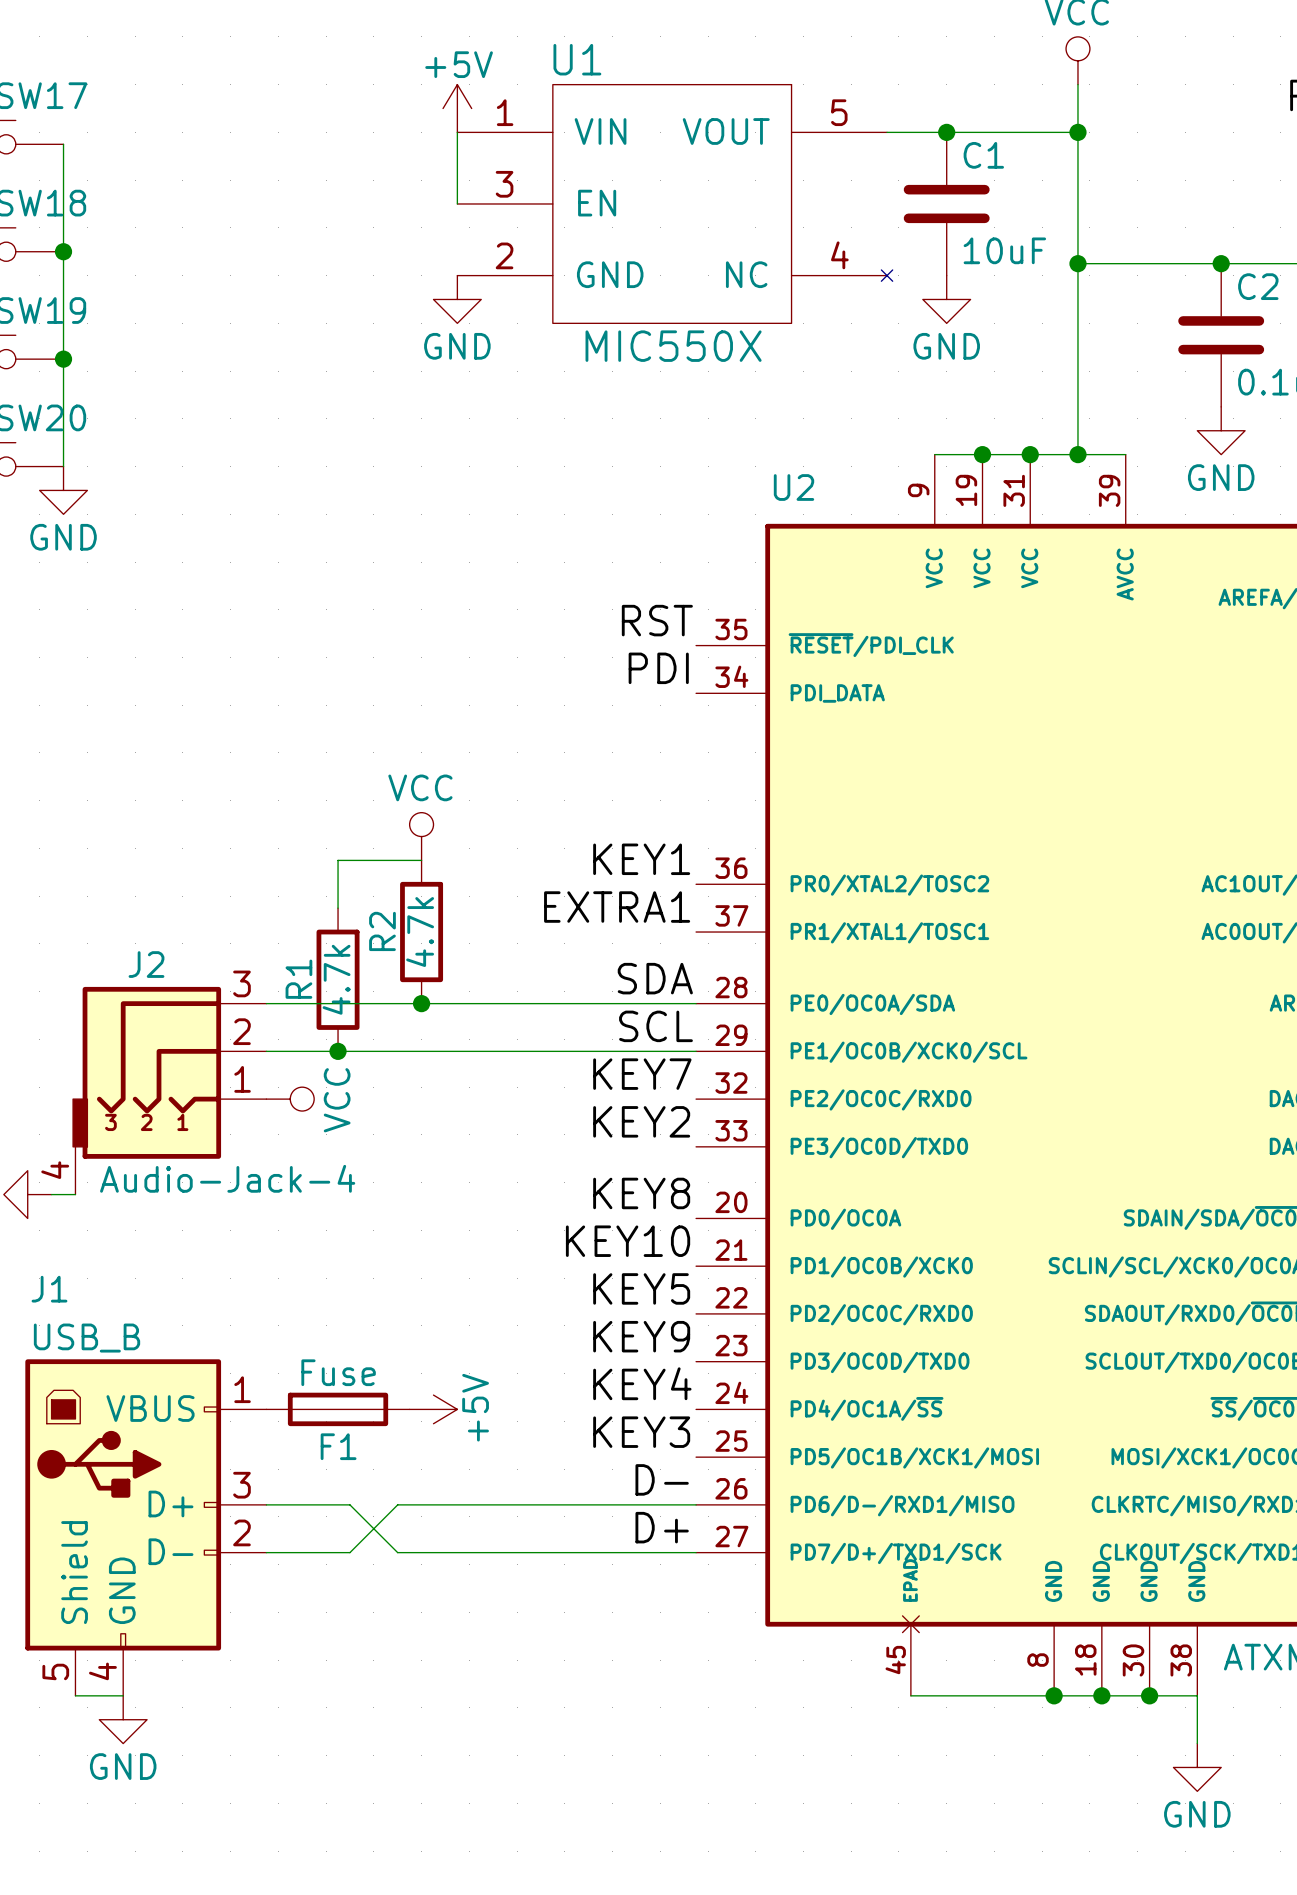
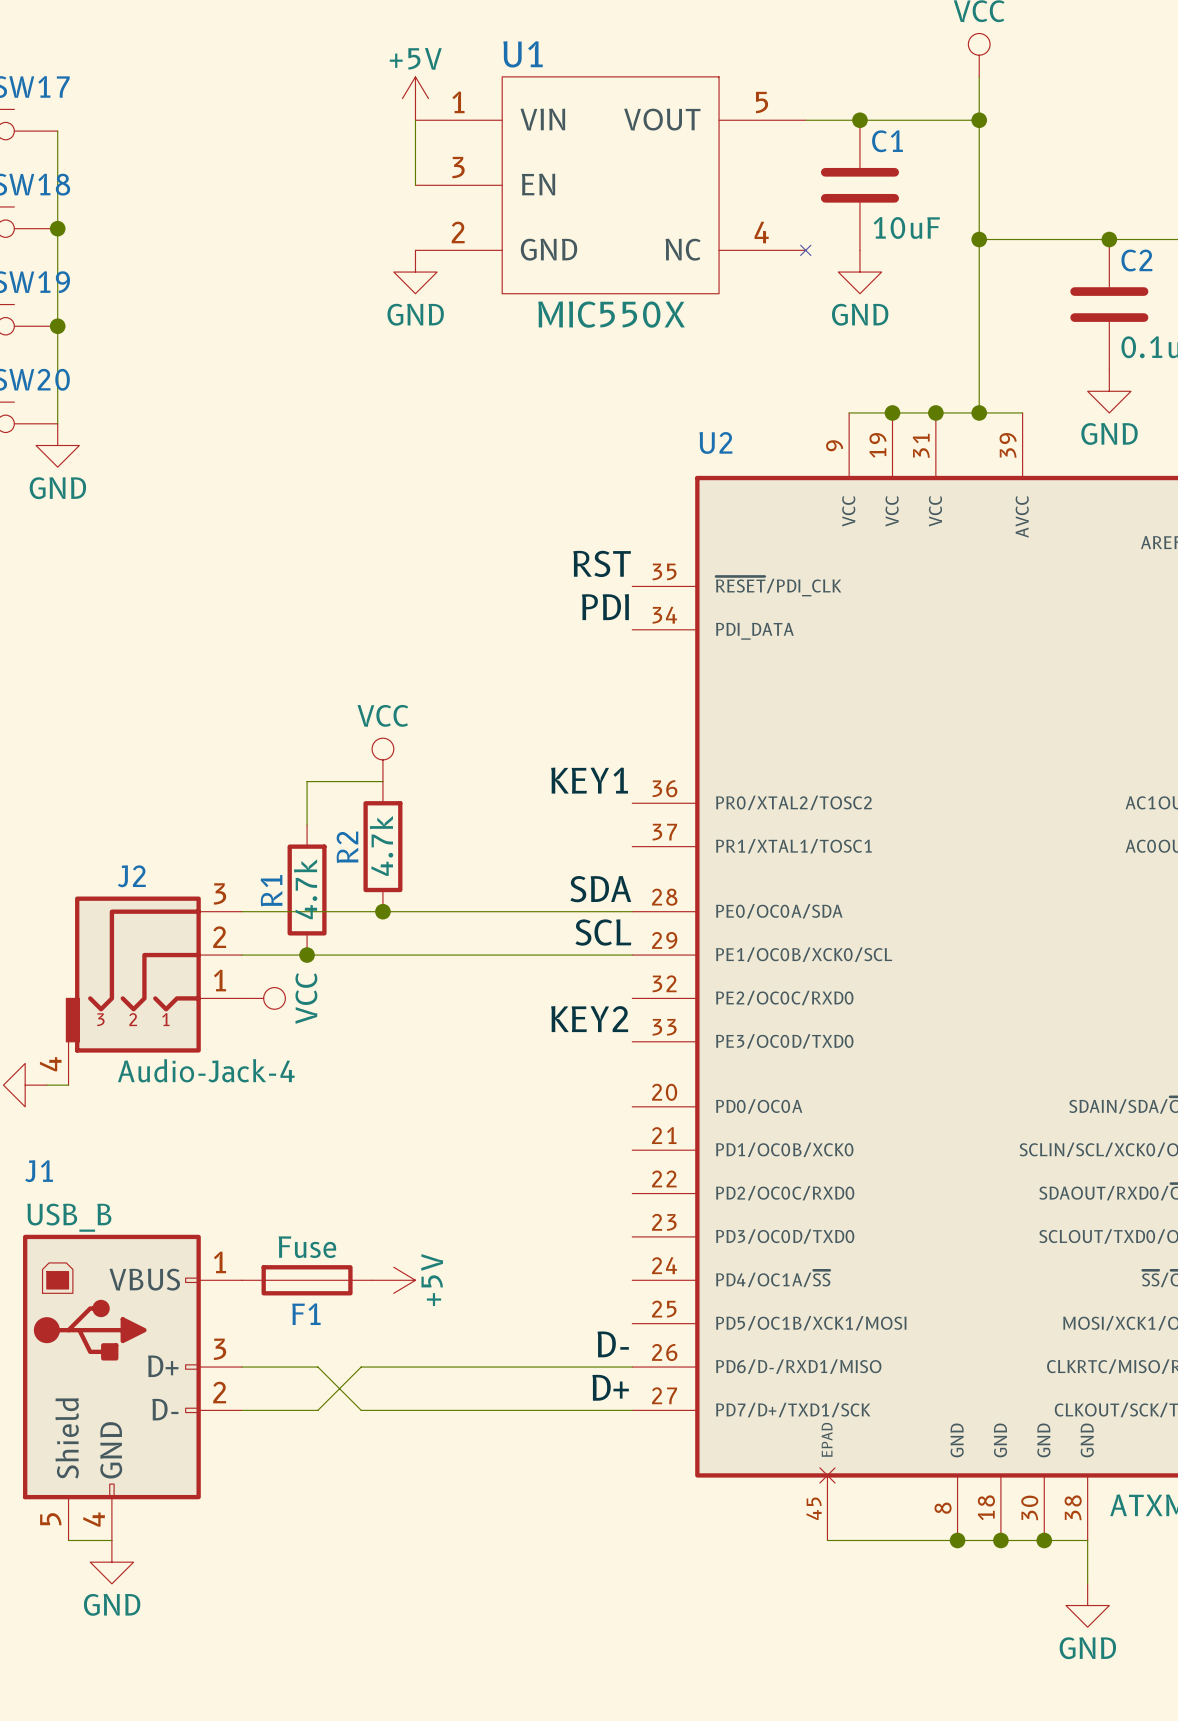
label: EXTRA1 (617, 907) -> none
label: KEY7 (642, 1074) -> none
label: KEY8 (641, 1193) -> none
label: KEY10 (628, 1241) -> none
label: KEY5 (641, 1288) -> none
label: KEY9 (641, 1336) -> none
label: KEY4 (642, 1383) -> none
label: KEY3 (641, 1432) -> none

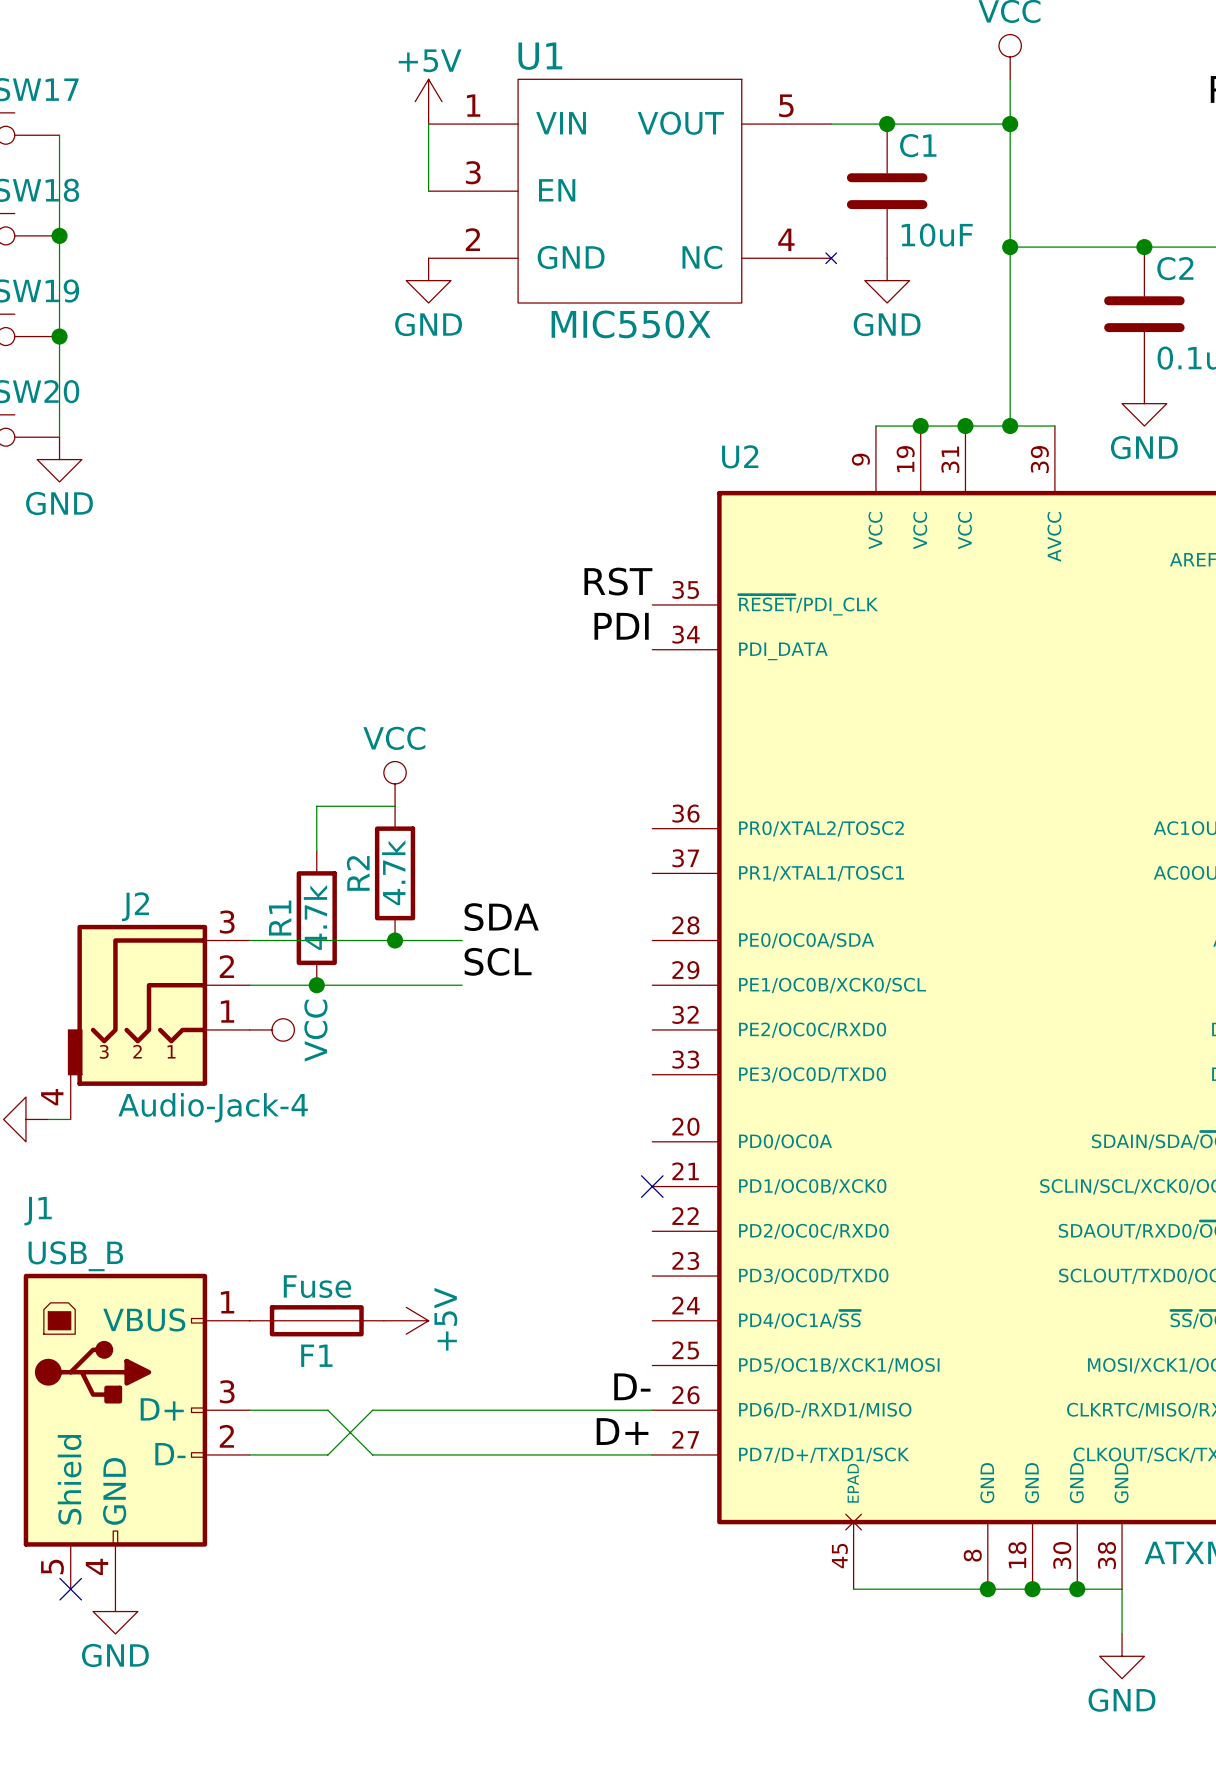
label: KEY1 (589, 780) -> none
label position: SDA (600, 889) -> SDA (501, 917)
wire: (447, 911) (632, 911) -> none
label position: SCL (603, 932) -> SCL (498, 961)
wire: (447, 955) (632, 955) -> none
label: KEY2 (589, 1019) -> none
no-connect mark: none -> (652, 1186)
wire: (68, 1540) (111, 1540) -> none
no-connect mark: none -> (70, 1589)

